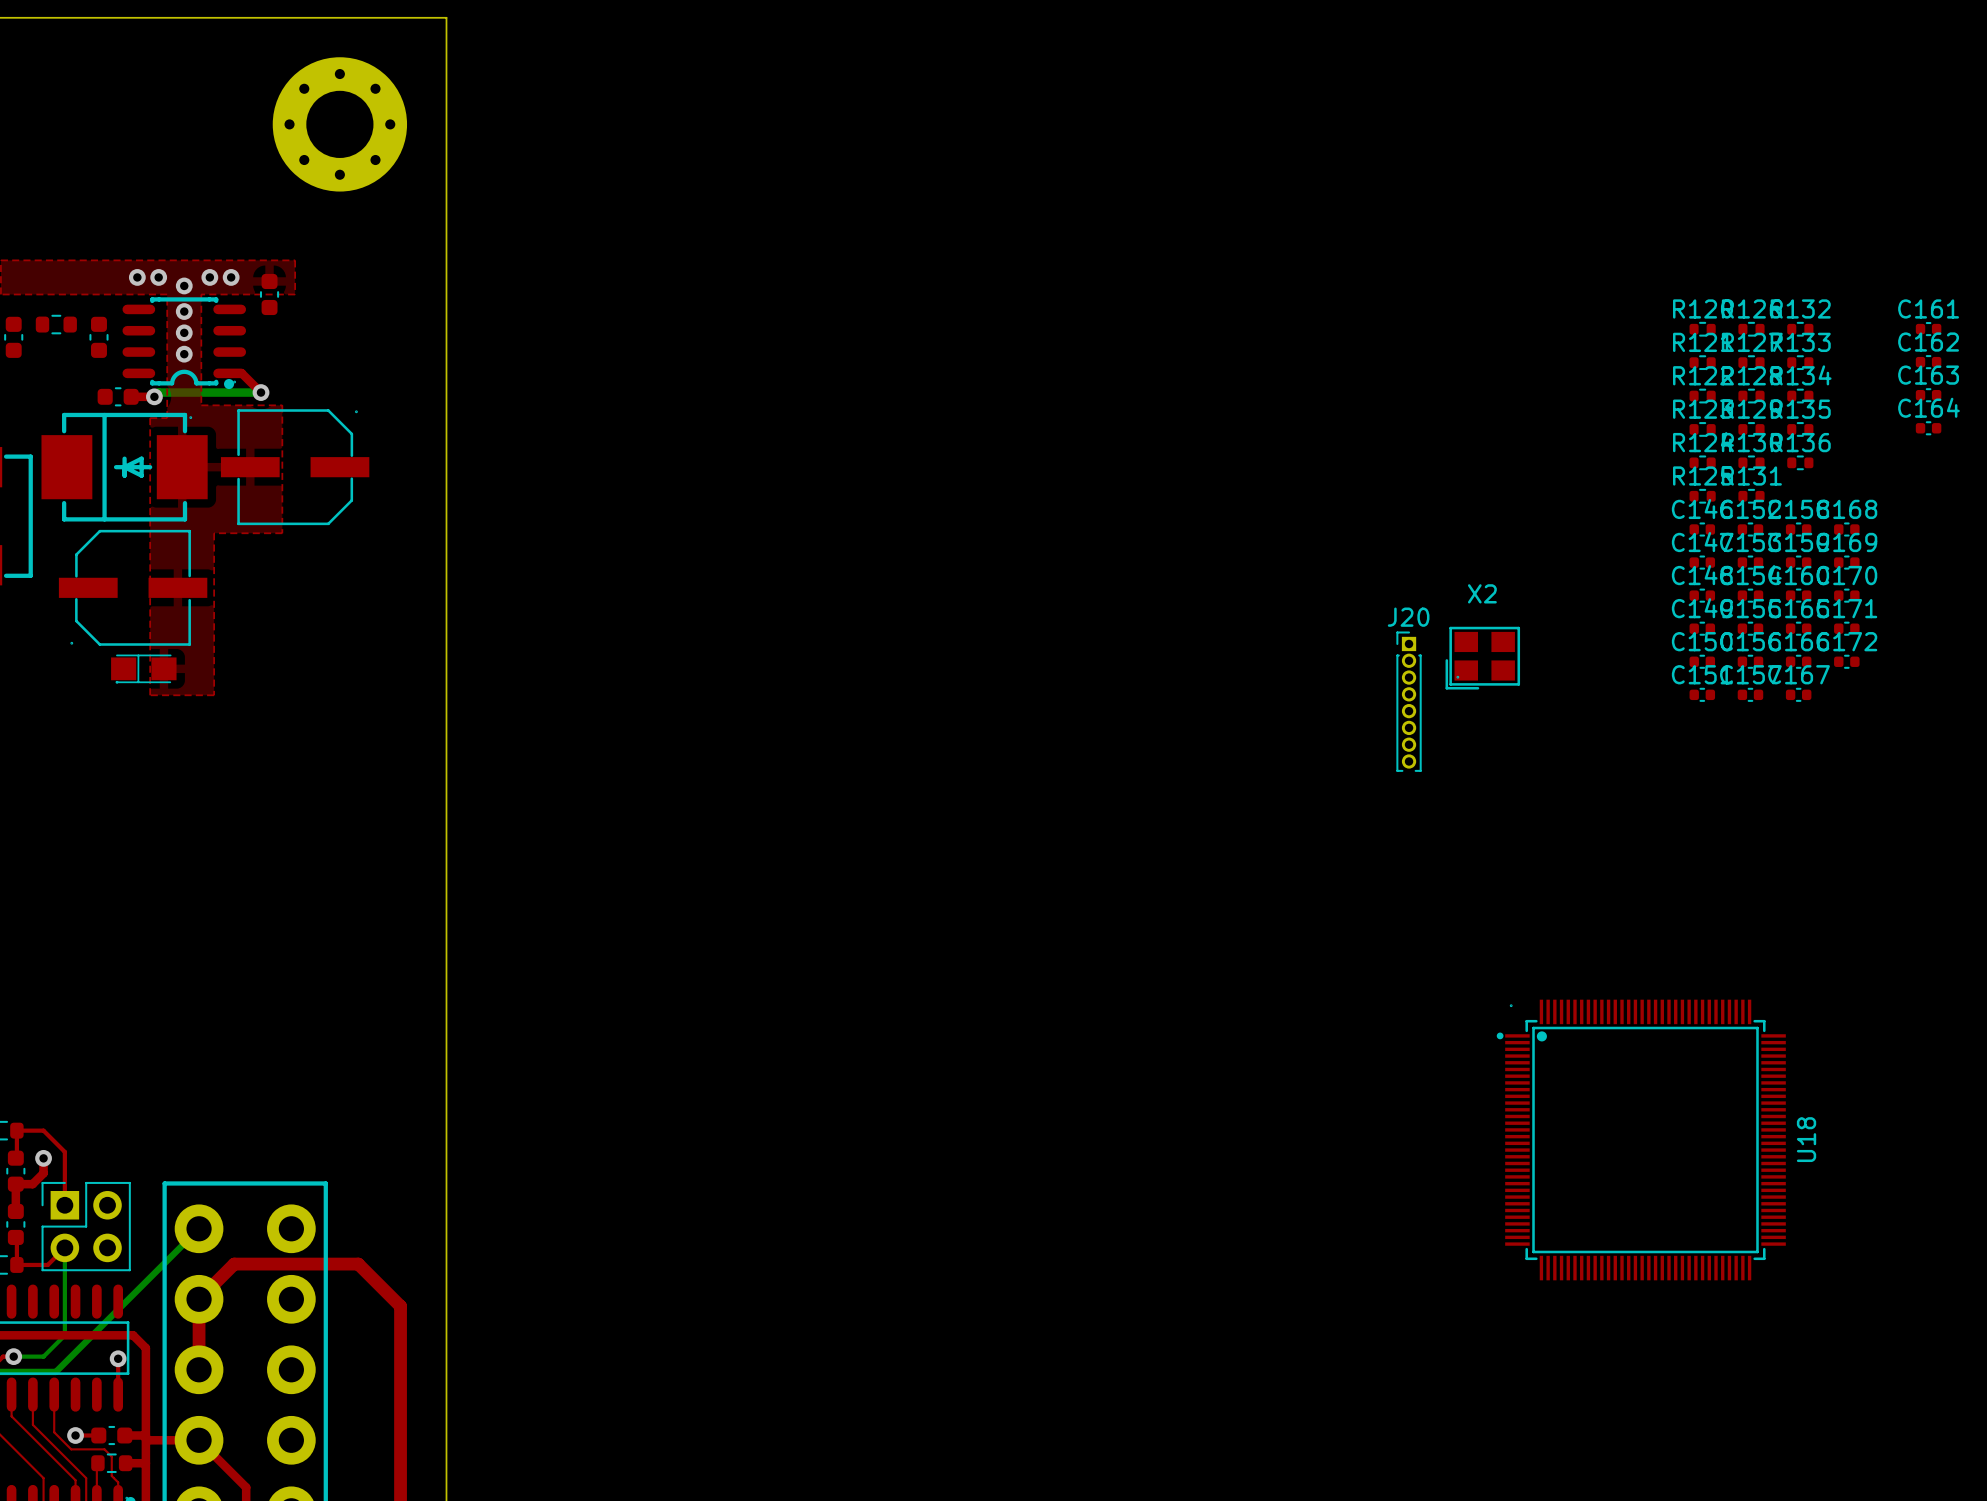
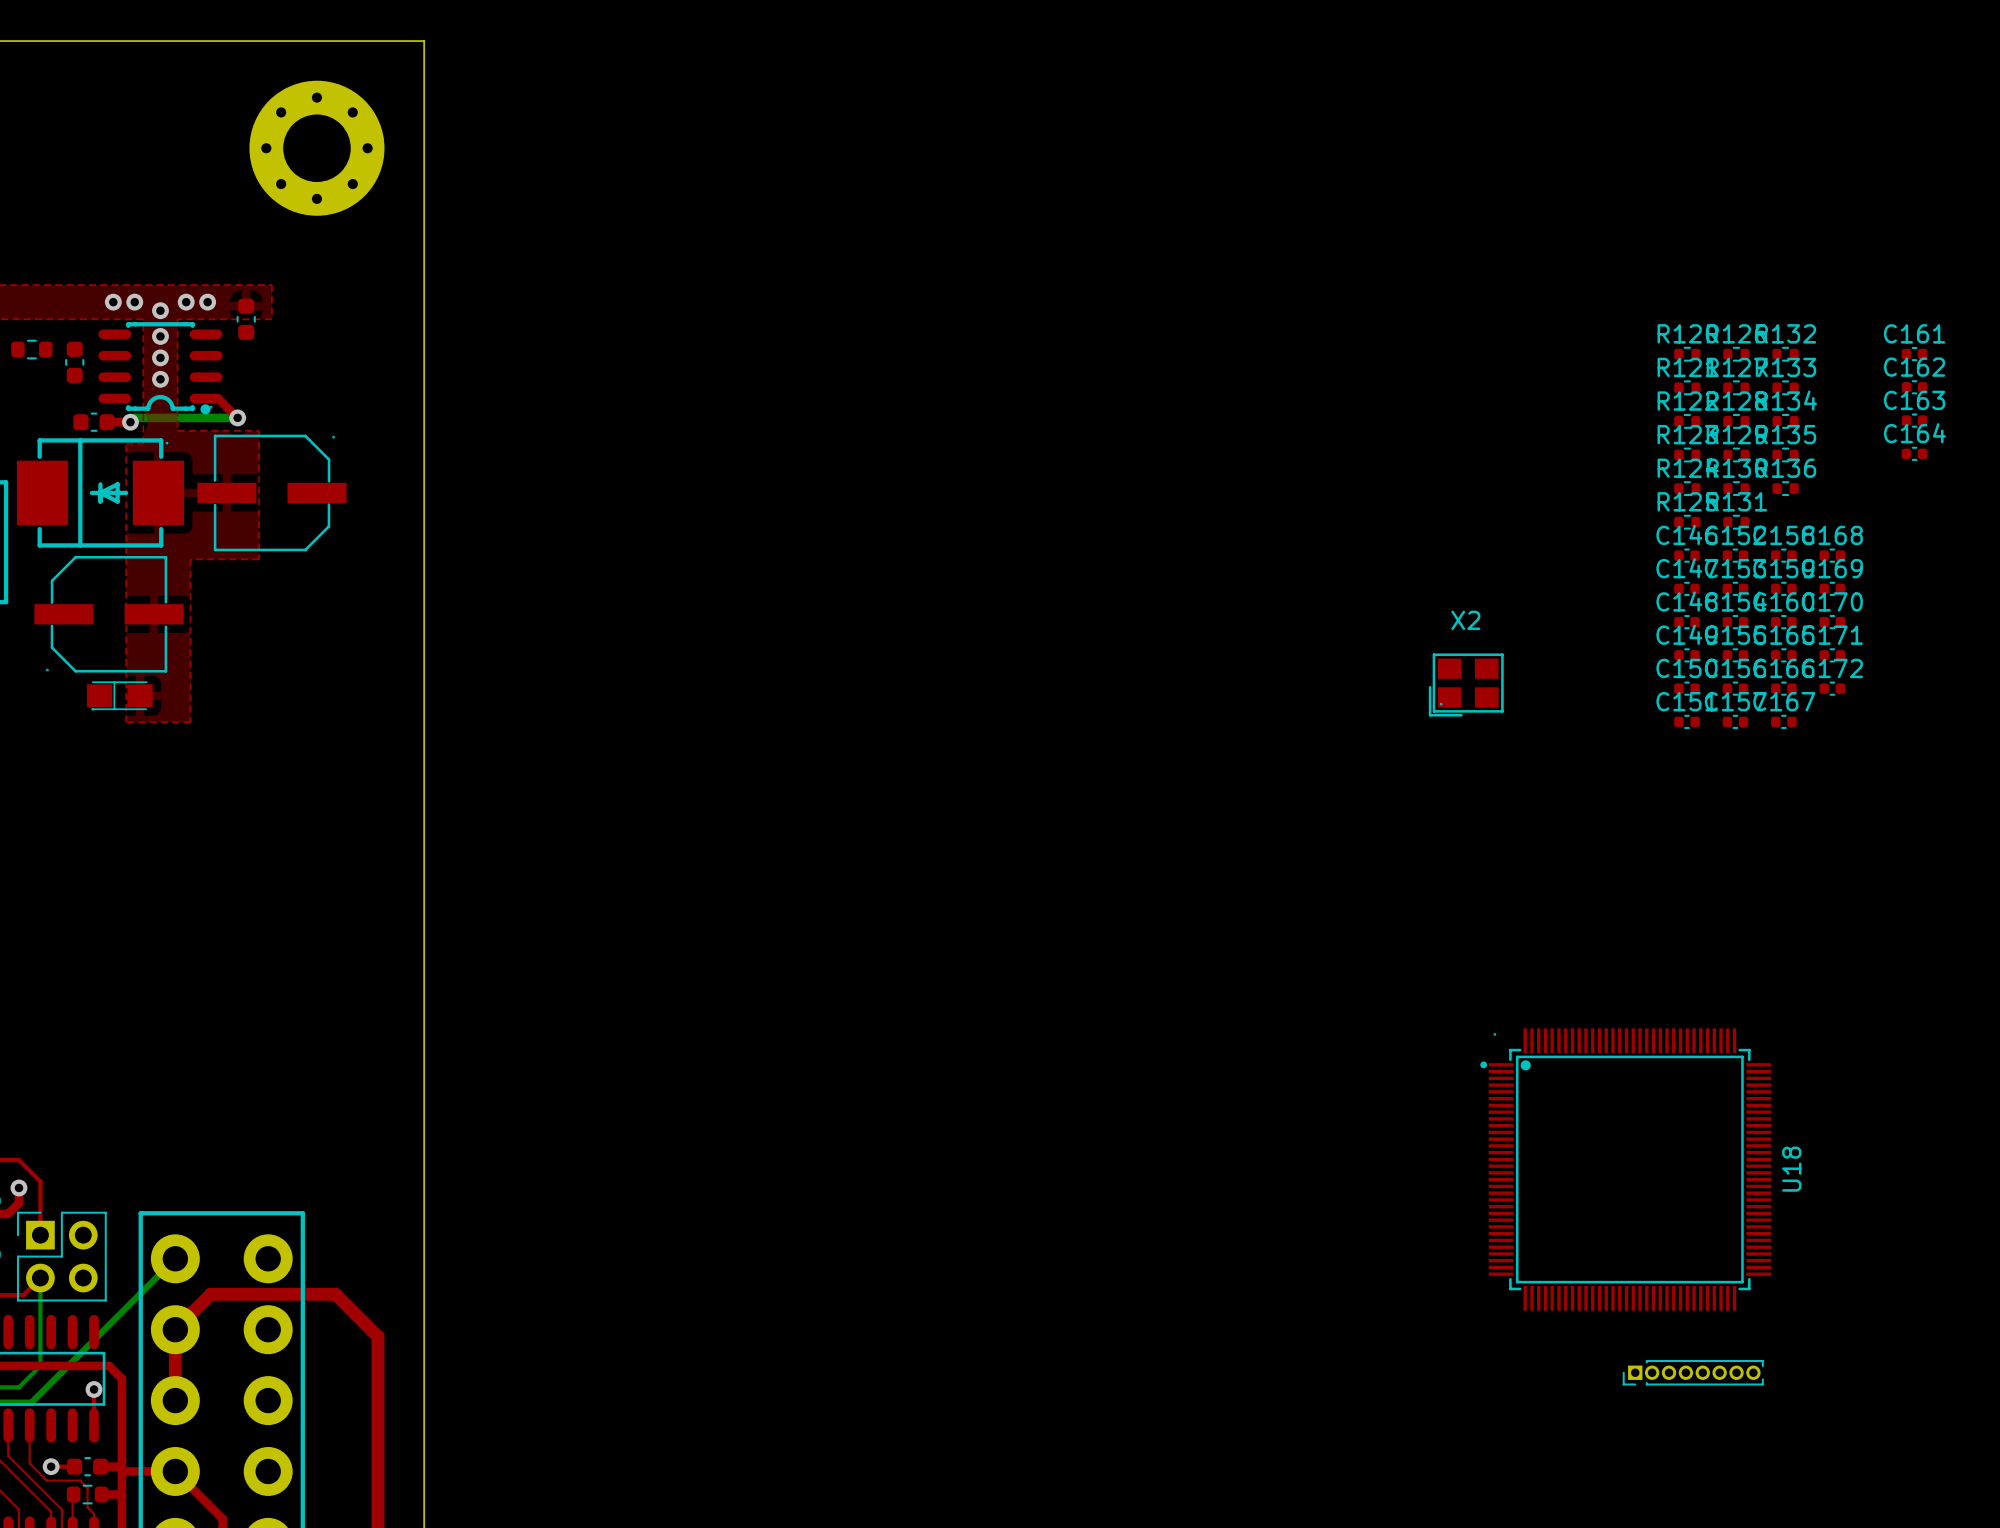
J20: (1409, 701) -> none
part: none -> (1693, 1372)

